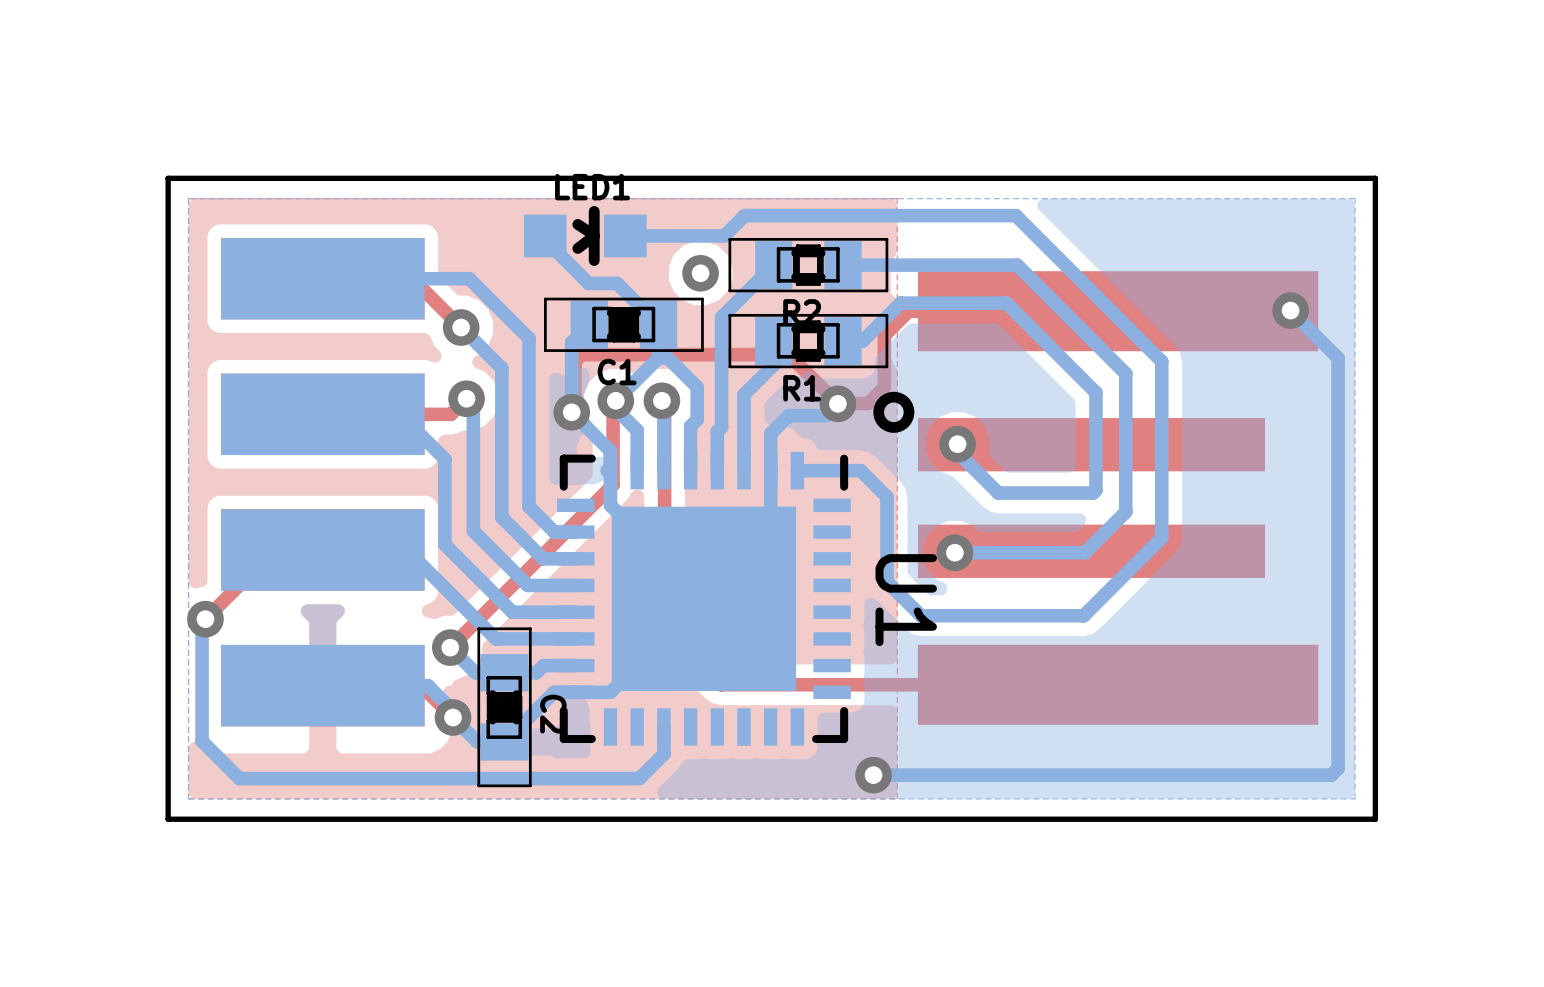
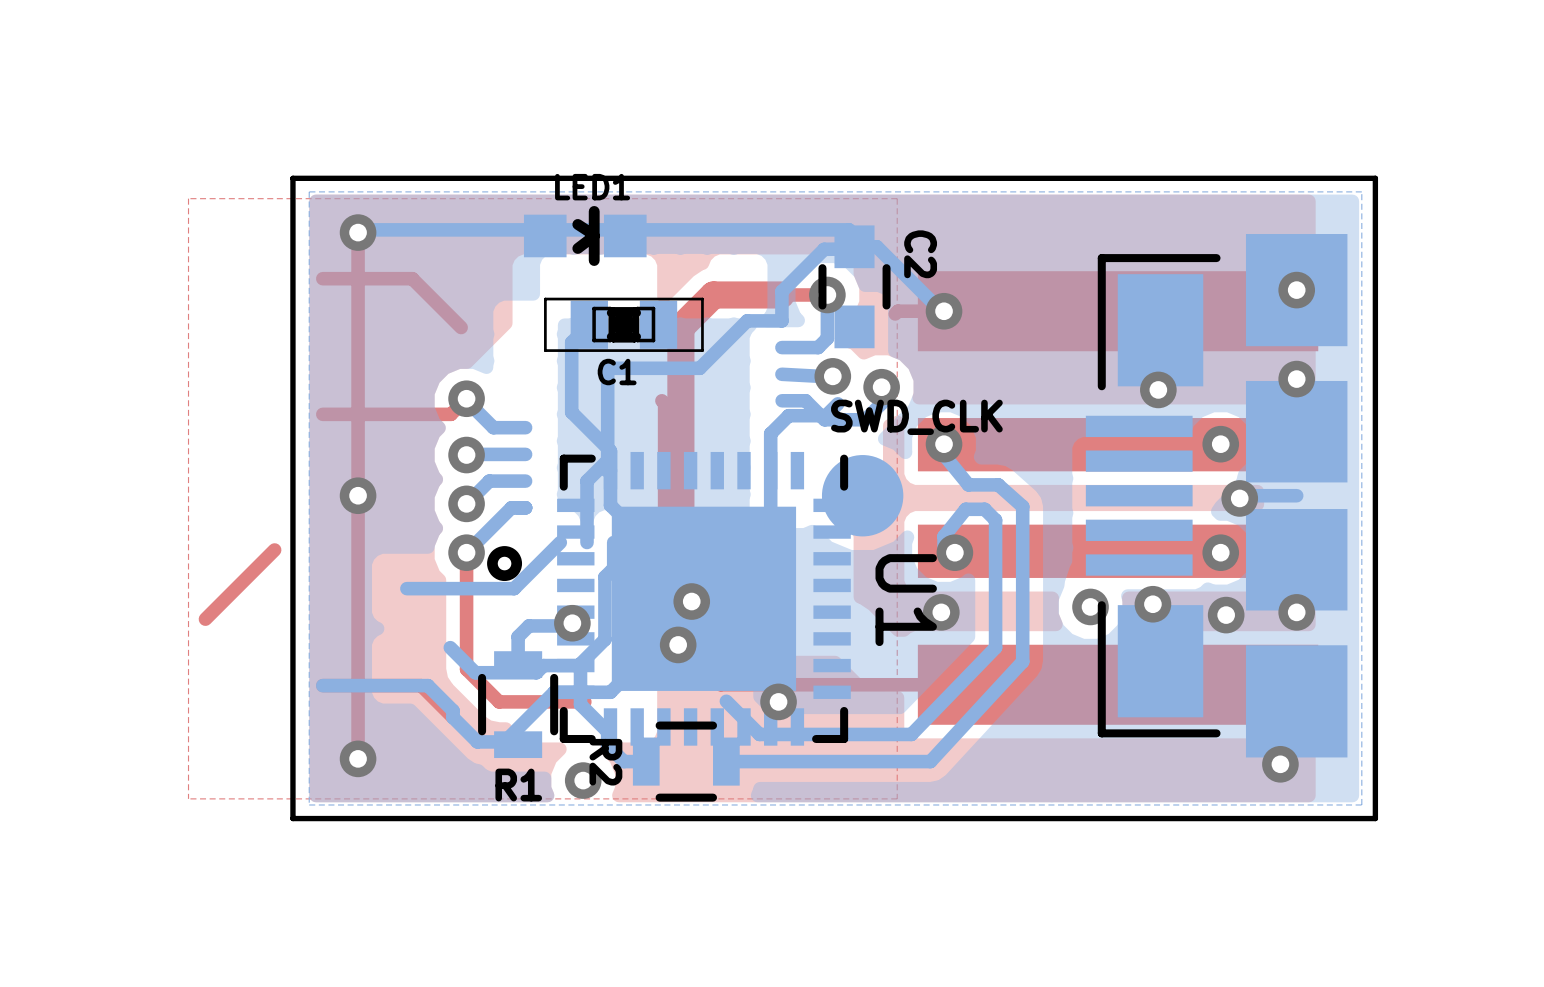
board edge: (292, 178) (168, 178) (168, 819) (1375, 819) -> (292, 178) (292, 818) (1375, 818)
bottom zone outline: (1355, 198) (1355, 798) (188, 798) (188, 198) (1355, 198) -> (1361, 191) (1361, 804) (309, 804) (309, 191) (1361, 191)
bottom track: none -> (358, 232) (360, 229) (849, 229) (854, 235) (854, 246) (876, 246) (941, 311) (944, 311)
top track: none -> (358, 232) (358, 758)
via: none -> (358, 232)
bottom track: (545, 235) (545, 240) (588, 283) (617, 283) (658, 324) -> none
bottom track: (625, 235) (724, 235) (744, 215) (1015, 215) (1161, 361) (1161, 537) (1083, 615) (920, 615) (887, 581) (887, 497) (860, 470) (797, 470) -> none
R2 footprint: [728, 238, 889, 293] -> [632, 721, 740, 802]
bottom track: none -> (854, 248) (824, 249) (781, 291) (781, 320) (747, 320) (699, 368) (607, 368) (607, 460) (587, 481) (587, 542)
bottom track: (764, 265) (773, 265) (721, 317) (721, 427) (717, 431) (717, 470) -> none
bottom track: (842, 265) (1017, 265) (1125, 373) (1125, 512) (1085, 552) (954, 552) -> none
via: (700, 273) -> none
bottom track: (322, 278) (469, 278) (528, 338) (528, 506) (554, 532) (575, 532) -> none
bottom track: none -> (827, 294) (827, 338) (818, 347) (781, 347)
top track: none -> (827, 294) (713, 294) (680, 327) (680, 549) (659, 571) (659, 625) (678, 644)
via: none -> (827, 294)
bottom track: (1290, 310) (1338, 358) (1338, 768) (1331, 775) (873, 775) -> none
via position: (1290, 310) -> (1296, 290)
top track: (908, 311) (884, 335) (884, 387) (868, 403) (838, 403) -> none
via: none -> (944, 311)
R1 footprint: [728, 313, 889, 369] -> [478, 651, 559, 759]
bottom track: (461, 327) (501, 368) (501, 517) (543, 558) (575, 558) -> none
via: (461, 327) -> none
bottom track: (773, 341) (773, 364) (744, 394) (744, 470) -> none
bottom track: (842, 341) (862, 341) (900, 303) (1006, 303) (1095, 392) (1095, 490) (1093, 493) (998, 493) (957, 452) (957, 444) -> none
bottom track: (658, 358) (615, 400) (615, 408) (637, 430) (637, 470) -> none
bottom track: (658, 358) (668, 358) (697, 387) (697, 419) (690, 426) (690, 470) -> none
bottom track: none -> (781, 374) (832, 377)
via: none -> (1296, 379)
bottom track: none -> (881, 387) (881, 403) (865, 419) (824, 419) (805, 400) (782, 400)
via: none -> (881, 387)
via: none -> (1158, 389)
drawing: [873, 391, 915, 433] -> none
bottom track: (466, 398) (473, 405) (473, 530) (527, 585) (575, 585) -> (466, 400) (493, 427) (525, 427)
top track: (615, 400) (613, 403) (613, 484) (450, 647) -> none
via: (615, 400) -> none
bottom track: (661, 400) (663, 402) (663, 470) -> none
via: (661, 400) -> none
top track: (837, 403) (788, 354) (581, 354) (575, 361) (575, 408) (571, 412) -> none
via position: (837, 403) -> (832, 376)
via: (571, 412) -> none
bottom track: (400, 414) (444, 459) (444, 544) (512, 612) (575, 612) -> none
bottom track: none -> (944, 444) (944, 455) (968, 484) (998, 484) (1022, 506) (1022, 661) (930, 761) (726, 761)
via position: (957, 444) -> (944, 444)
via: none -> (1220, 444)
bottom track: none -> (525, 454) (467, 454)
via: none -> (466, 455)
bottom track: none -> (525, 481) (489, 481) (466, 503)
part: (322, 482) -> none
via: none -> (358, 495)
SWD_CLK: none -> (862, 495)
part: none -> (1216, 495)
bottom track: none -> (1296, 495) (1242, 495) (1239, 498)
via: none -> (1239, 498)
via: none -> (466, 503)
bottom track: none -> (525, 507) (511, 507) (466, 552)
bottom track: none -> (560, 542) (514, 588) (406, 588)
bottom track: none -> (613, 542) (613, 568) (604, 577) (604, 639) (580, 663) (580, 704) (607, 731) (607, 745) (623, 761) (646, 761)
drawing: none -> [487, 546, 523, 582]
bottom track: (322, 549) (406, 549) (495, 638) (575, 638) -> none
bottom track: none -> (944, 549) (944, 536) (965, 509) (984, 509) (995, 520) (995, 647) (911, 734) (759, 734) (726, 701)
top track: none -> (466, 552) (466, 669) (499, 701) (584, 701)
via: none -> (466, 552)
via: none -> (1220, 552)
via: none -> (691, 601)
via: none -> (1152, 604)
via: none -> (1090, 606)
via: none -> (941, 612)
via: none -> (1296, 612)
via: none -> (1226, 615)
bottom track: (205, 619) (202, 622) (202, 741) (239, 778) (639, 778) (663, 754) (663, 726) -> none
via: (205, 619) -> none
bottom track: none -> (572, 623) (569, 625) (528, 625) (518, 636) (518, 664)
via: none -> (572, 623)
C2 footprint: [477, 627, 532, 788] -> [818, 225, 891, 349]
via: none -> (678, 644)
via: (450, 647) -> none
via: none -> (778, 701)
via: (453, 717) -> none
via: none -> (358, 758)
via: none -> (1280, 764)
via: (873, 775) -> none
via: none -> (583, 780)

